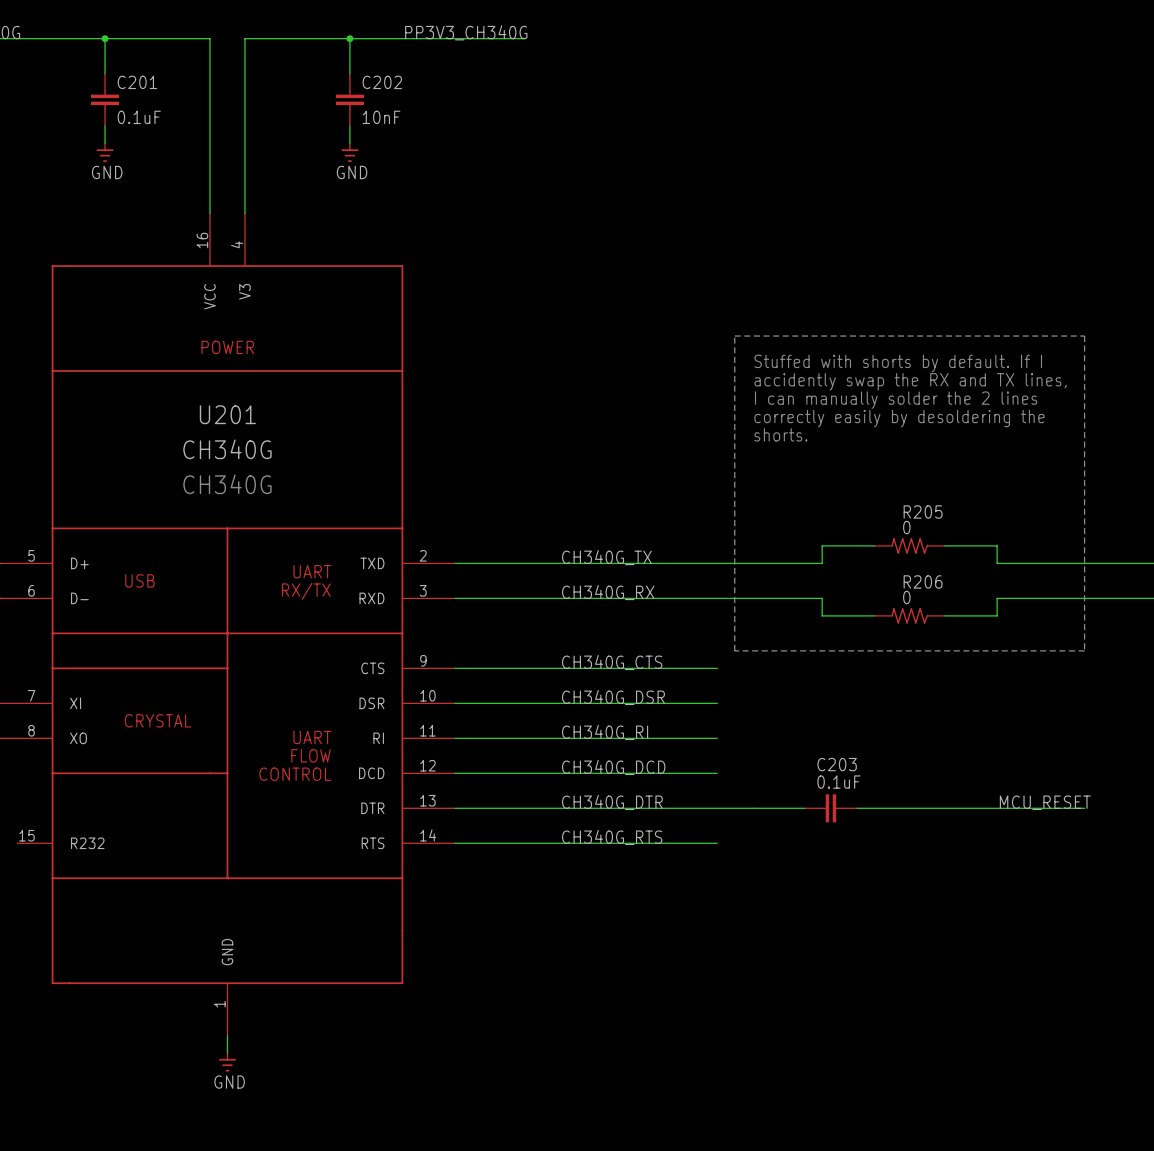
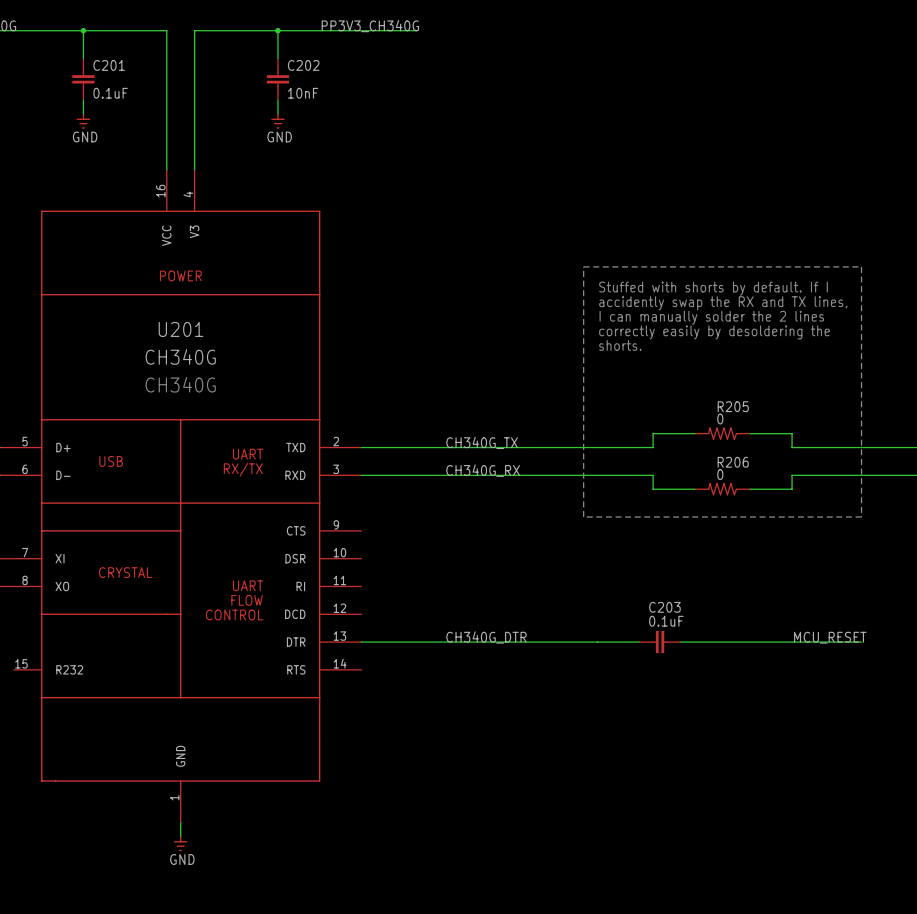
label: CH340G_CTS (612, 662) -> none
wire: (454, 668) (717, 668) -> none
label: CH340G_DSR (613, 697) -> none
wire: (454, 703) (717, 703) -> none
label: CH340G_RI (605, 732) -> none
wire: (454, 738) (717, 738) -> none
label: CH340G_DCD (613, 767) -> none
wire: (454, 773) (717, 773) -> none
label: CH340G_RTS (612, 837) -> none
wire: (454, 843) (717, 843) -> none

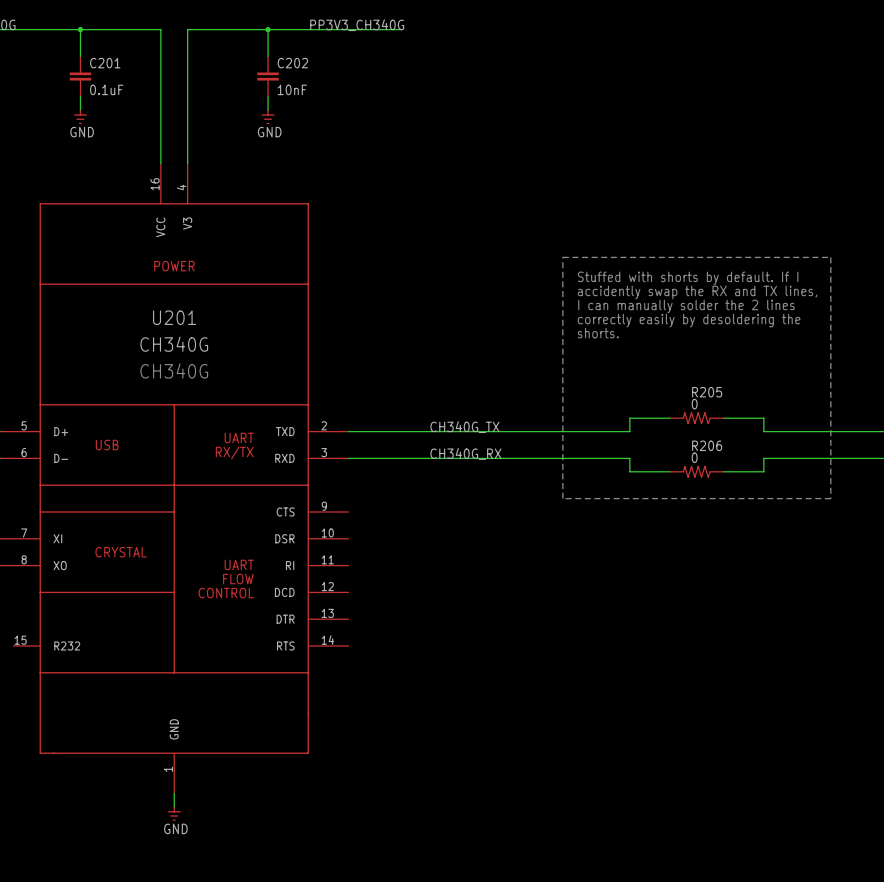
label: CH340G_DTR (486, 637) -> none
label: MCU_RESET (830, 637) -> none
wire: (361, 642) (639, 642) -> none
C203: 0.1uF (660, 642) -> none
wire: (680, 642) (861, 642) -> none

